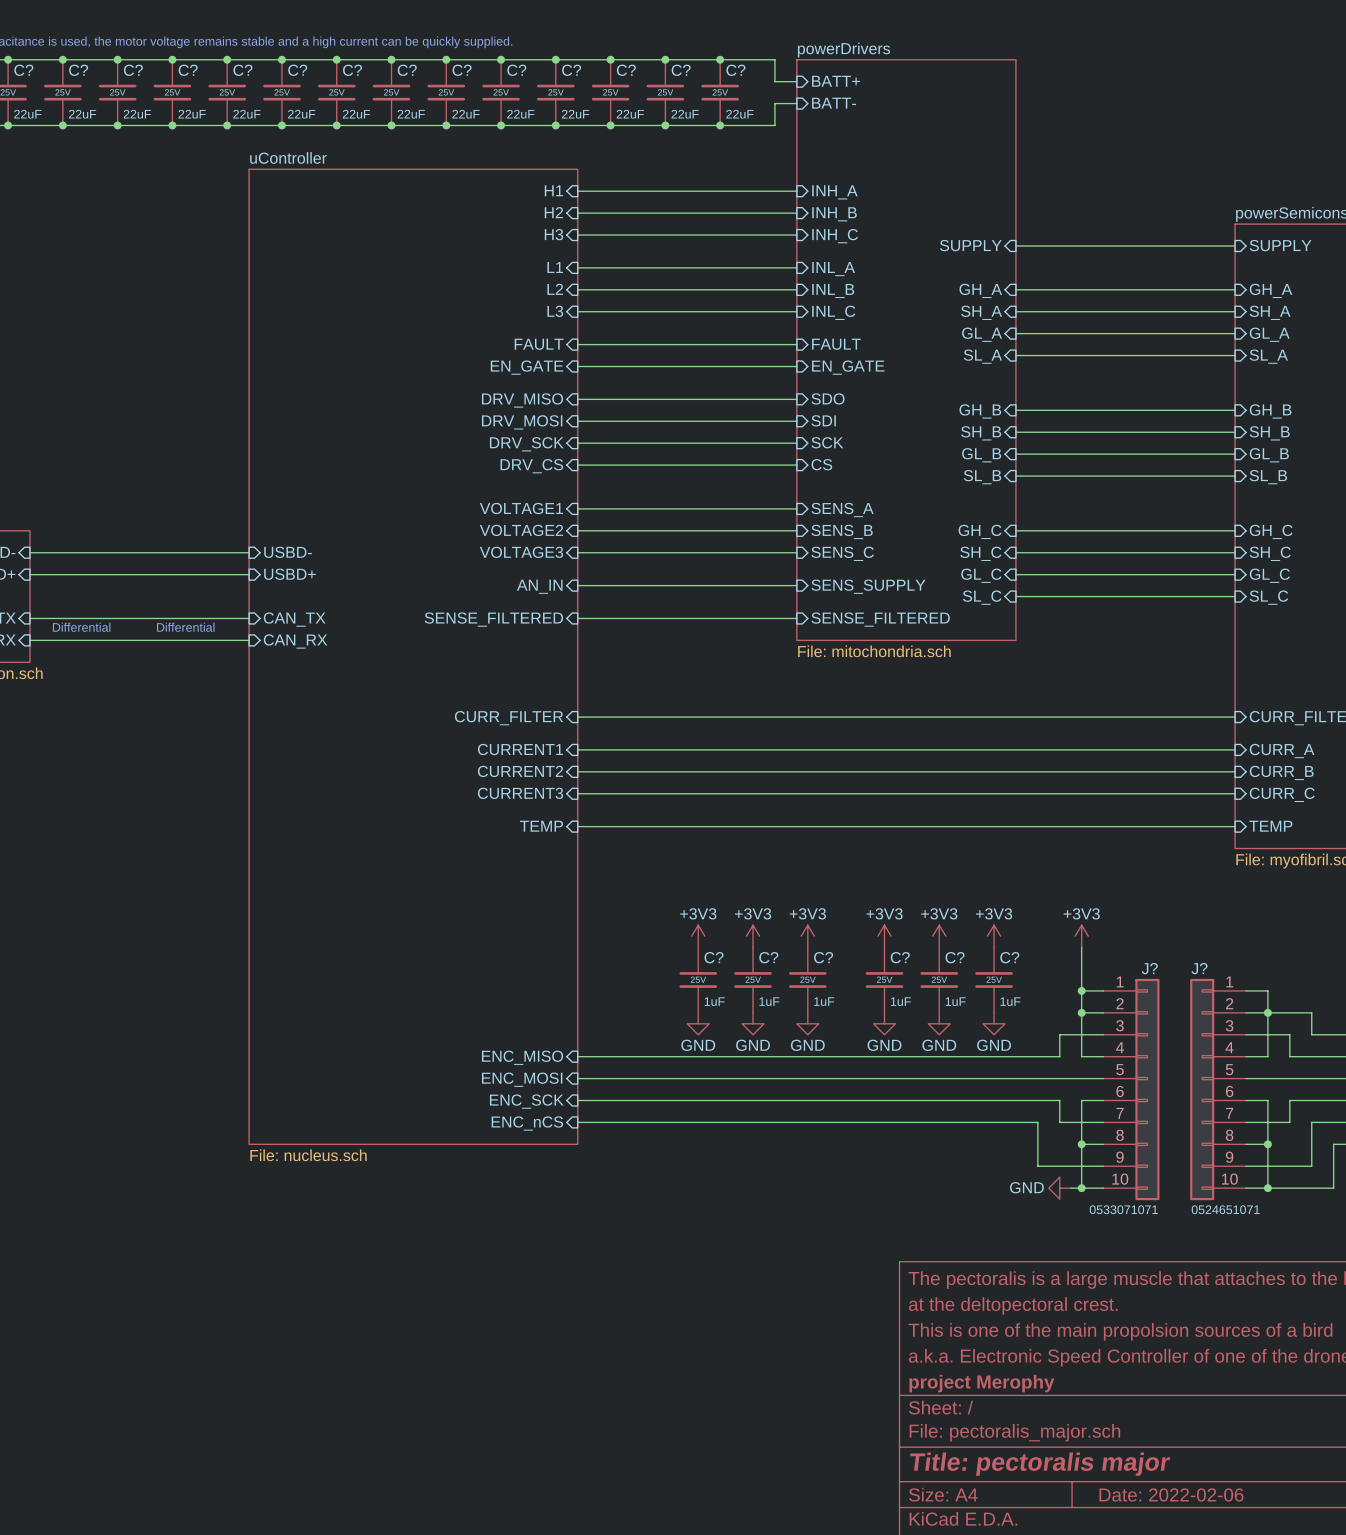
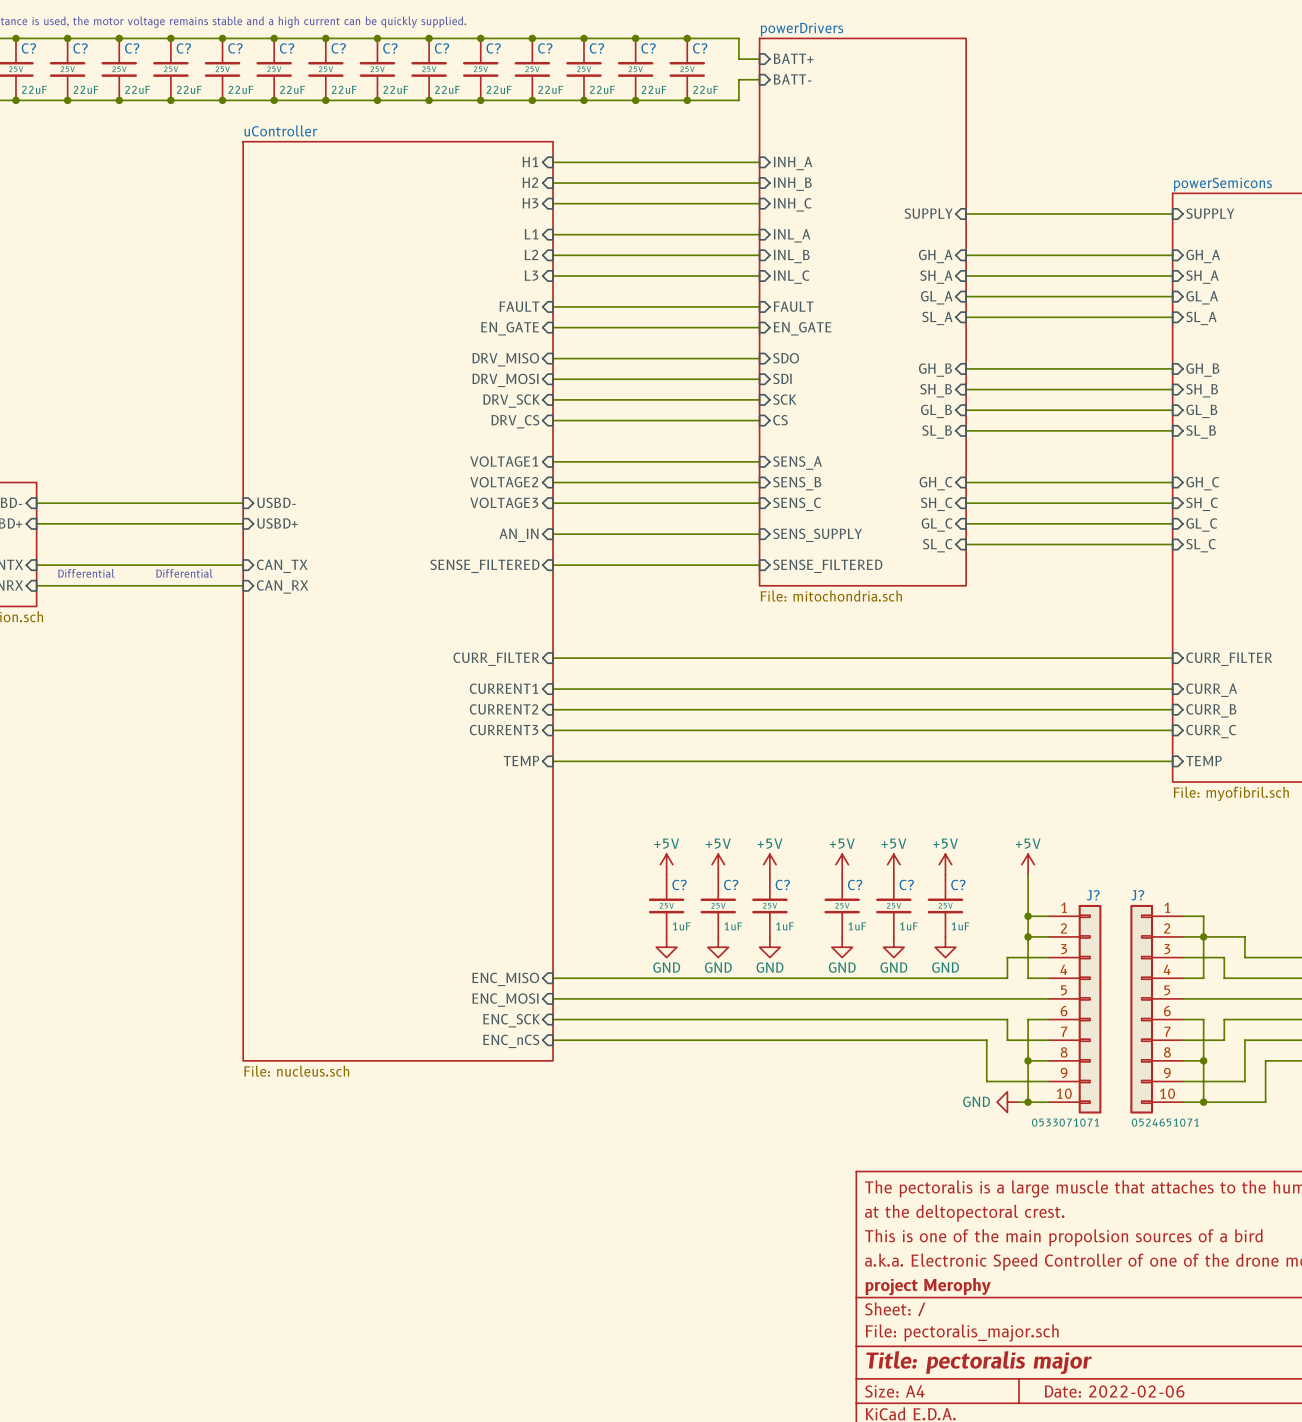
power symbol: +3V3 (698, 936) -> +5V (666, 864)
power symbol: +3V3 (753, 936) -> +5V (718, 864)
power symbol: +3V3 (807, 936) -> +5V (769, 864)
power symbol: +3V3 (884, 936) -> +5V (842, 864)
power symbol: +3V3 (939, 936) -> +5V (893, 864)
power symbol: +3V3 (994, 936) -> +5V (945, 864)
power symbol: +3V3 (1081, 936) -> +5V (1028, 864)

